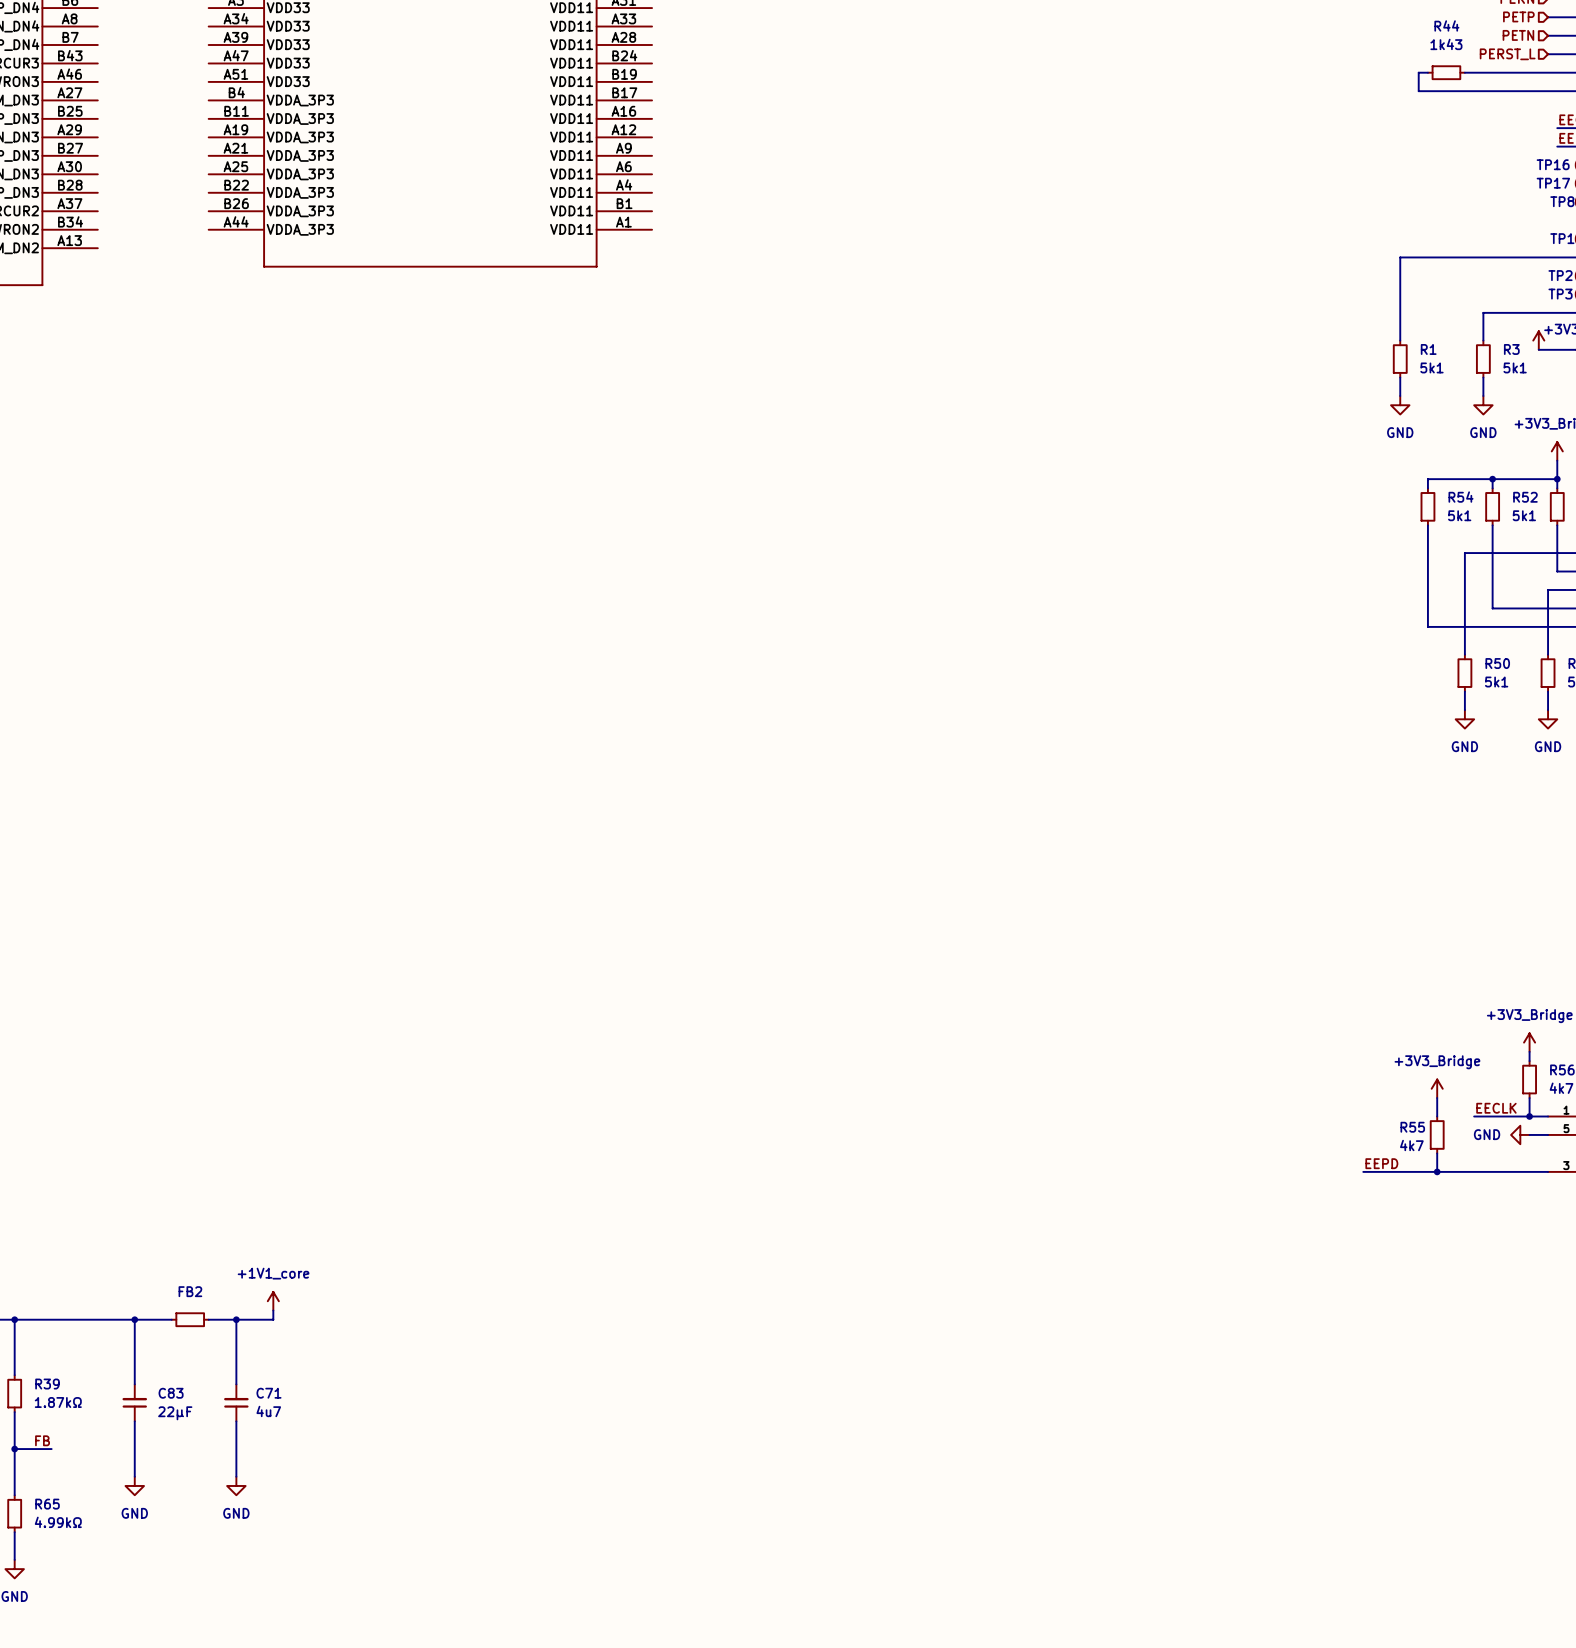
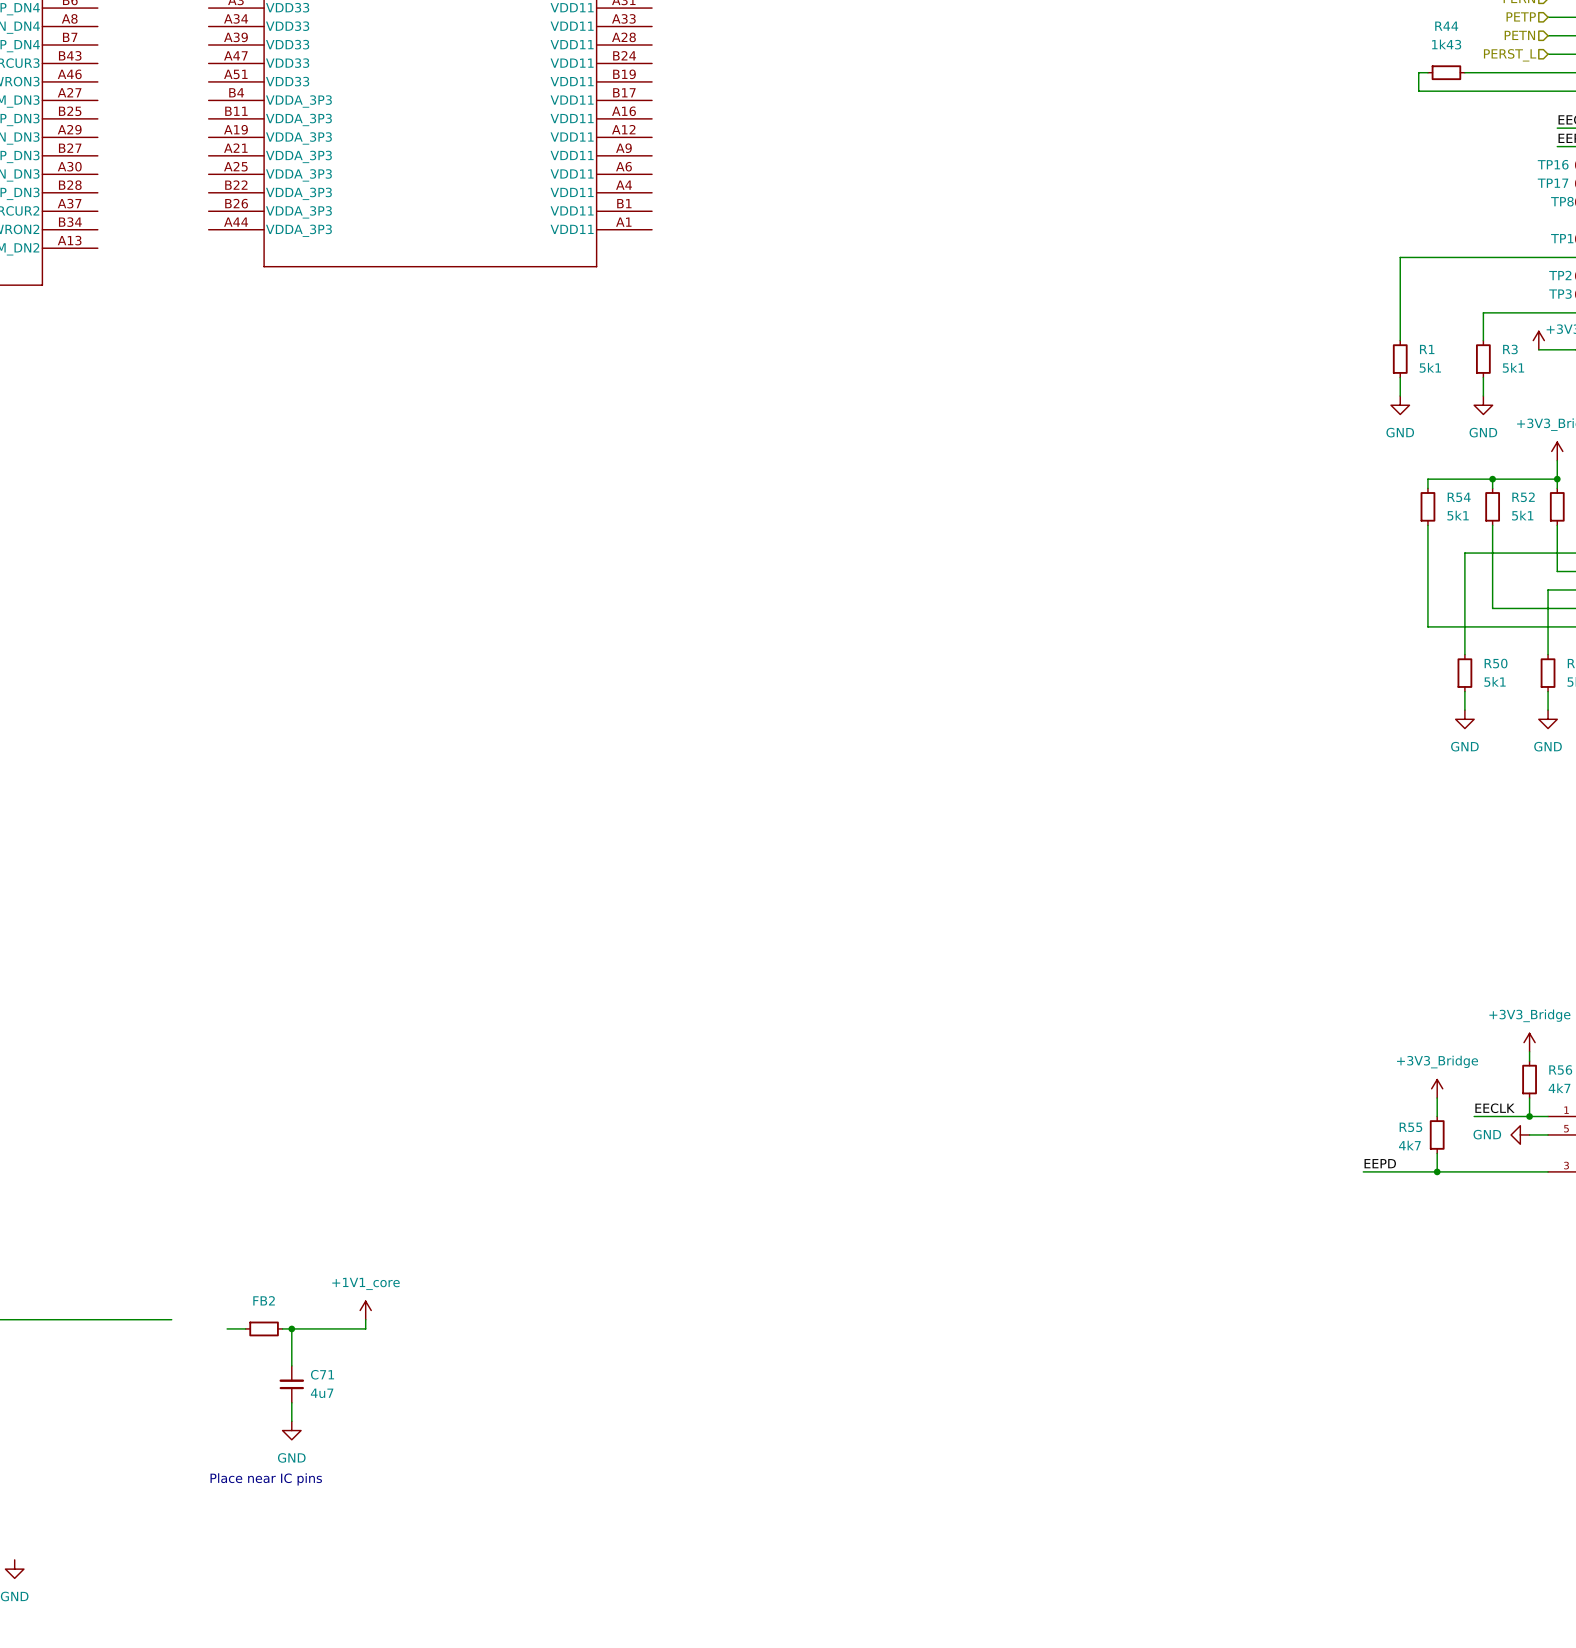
power symbol position: +1V1_core (273, 1301) -> +1V1_core (365, 1310)
wire: (273, 1310) (273, 1319) (208, 1319) -> none
wire: (14, 1319) (14, 1375) -> none
junction: (14, 1319) -> none
wire: (134, 1319) (134, 1384) -> none
junction: (134, 1319) -> none
FB2 position: (190, 1319) -> (264, 1328)
wire: (236, 1319) (236, 1384) -> none
junction: (236, 1319) -> none
wire: none -> (365, 1319) (365, 1328) (282, 1328)
wire: none -> (227, 1328) (245, 1328)
wire: none -> (291, 1328) (291, 1365)
junction: none -> (291, 1328)
R39: (14, 1393) -> none
C83: (134, 1402) -> none
C71 position: (236, 1402) -> (291, 1384)
wire: none -> (291, 1402) (291, 1421)
wire: (14, 1412) (14, 1495) -> none
wire: (134, 1421) (134, 1476) -> none
wire: (236, 1421) (236, 1476) -> none
label: FB (42, 1440) -> none
wire: (14, 1449) (51, 1449) -> none
junction: (14, 1449) -> none
text: none -> Place near IC pins (266, 1479)
power symbol: GND (134, 1485) -> none
power symbol position: GND (236, 1485) -> GND (291, 1430)
R65: (14, 1513) -> none
wire: (14, 1532) (14, 1559) -> none

